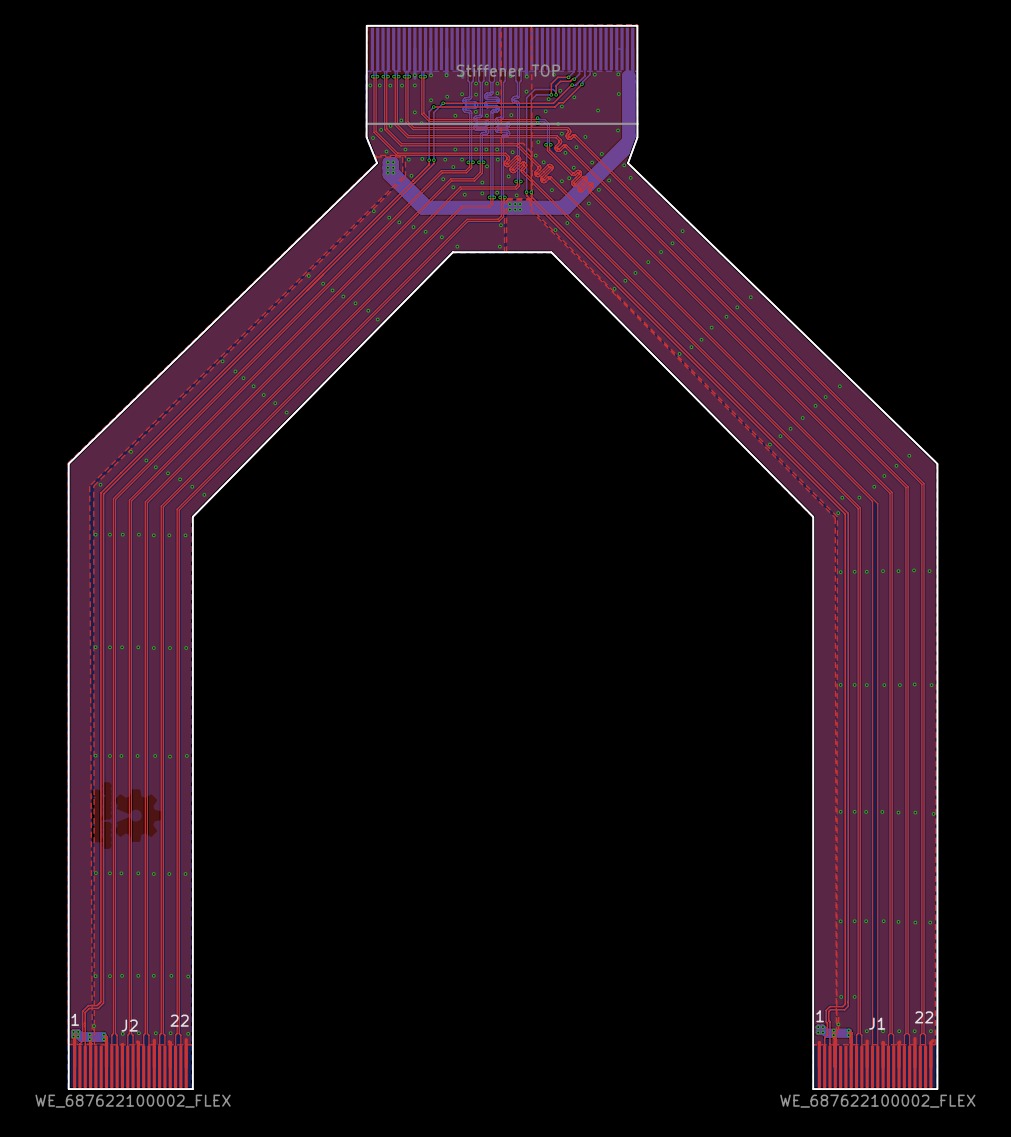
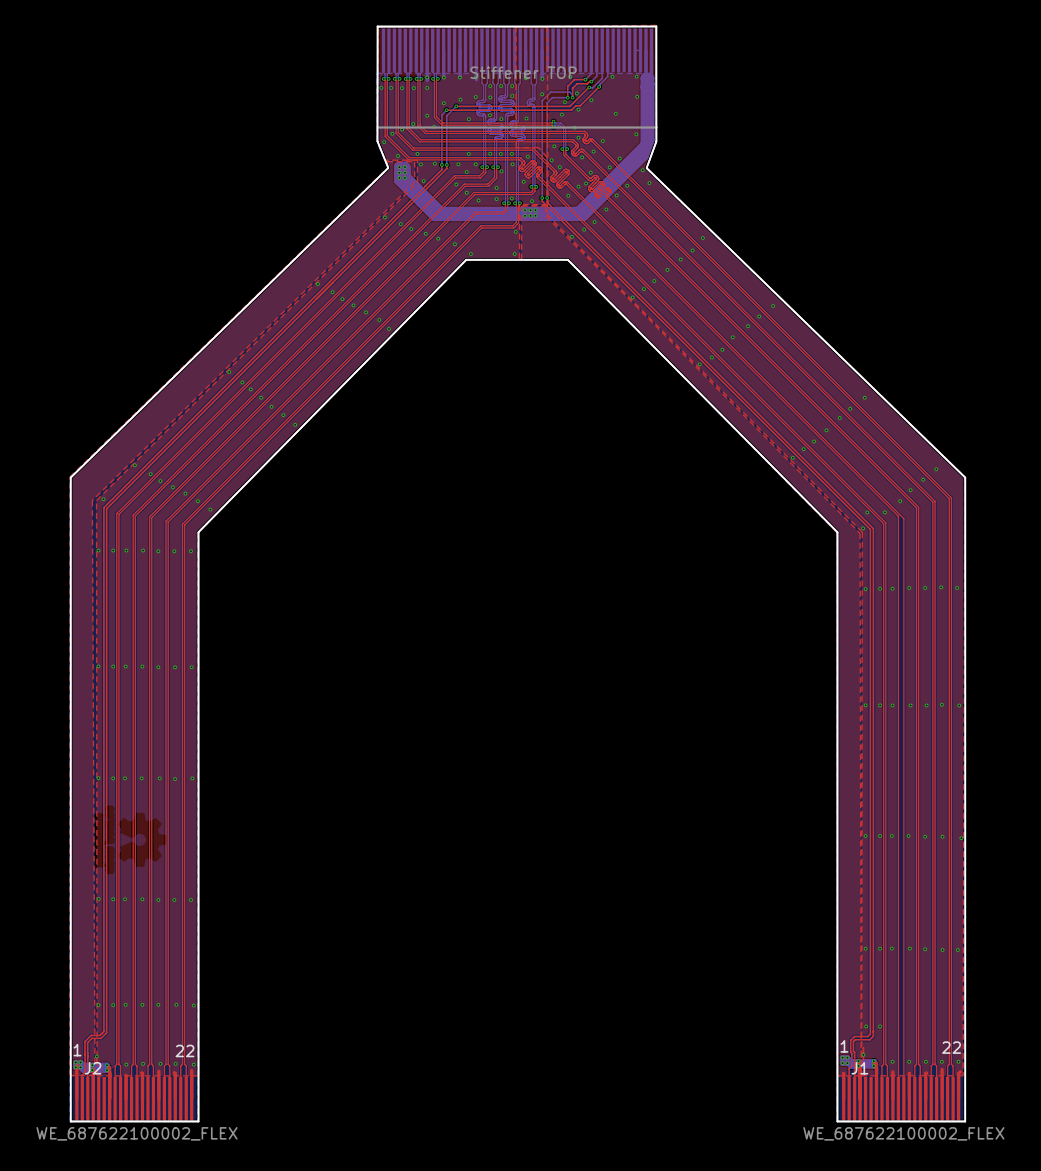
J1 name position: J1 (877, 1023) -> J1 (859, 1068)
J2 name position: J2 (129, 1025) -> J2 (93, 1068)

